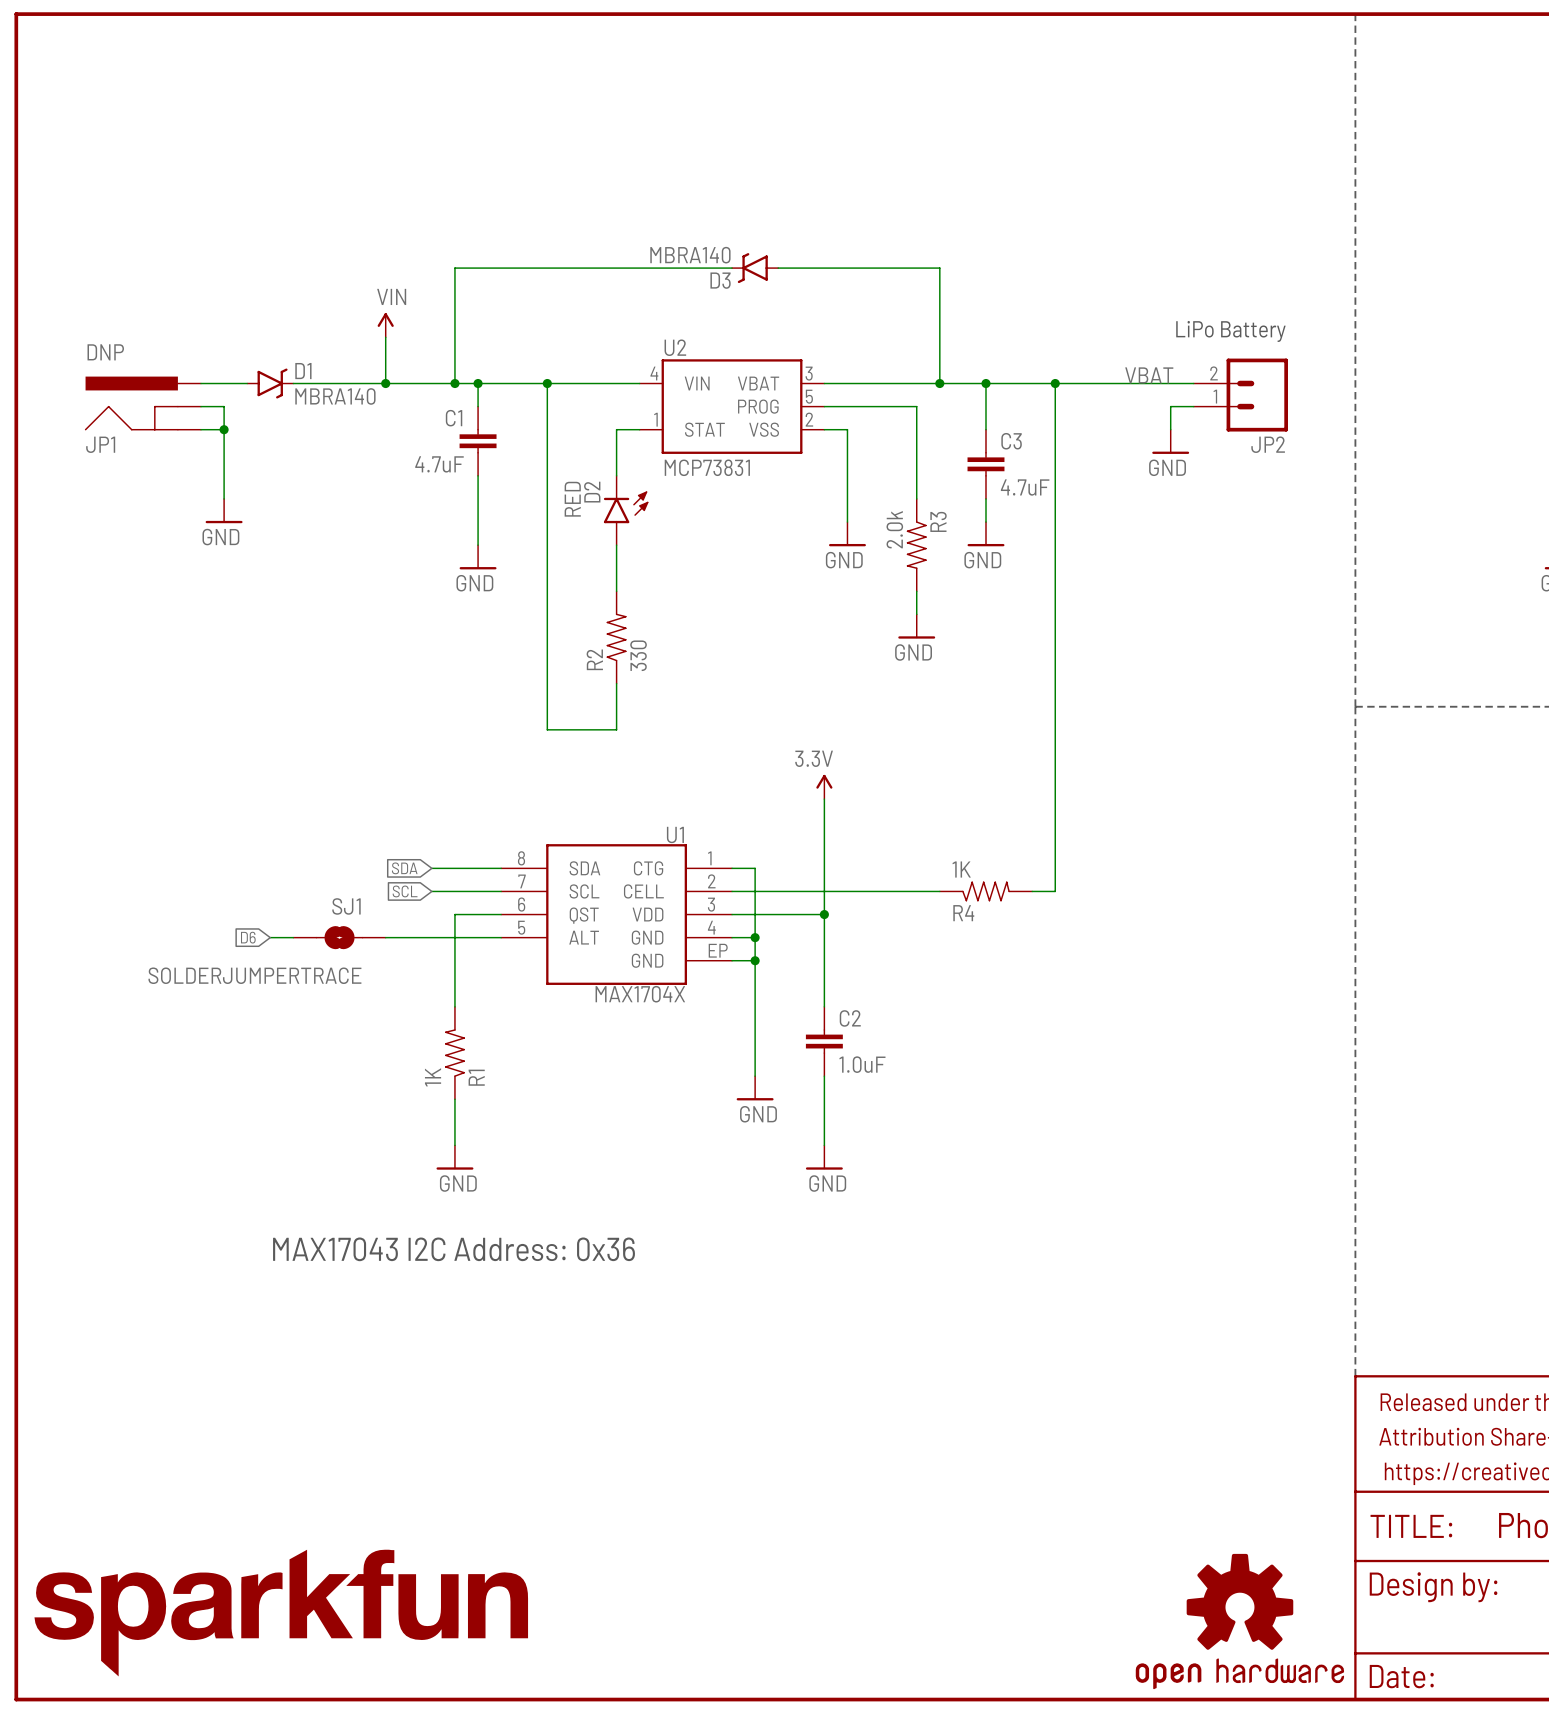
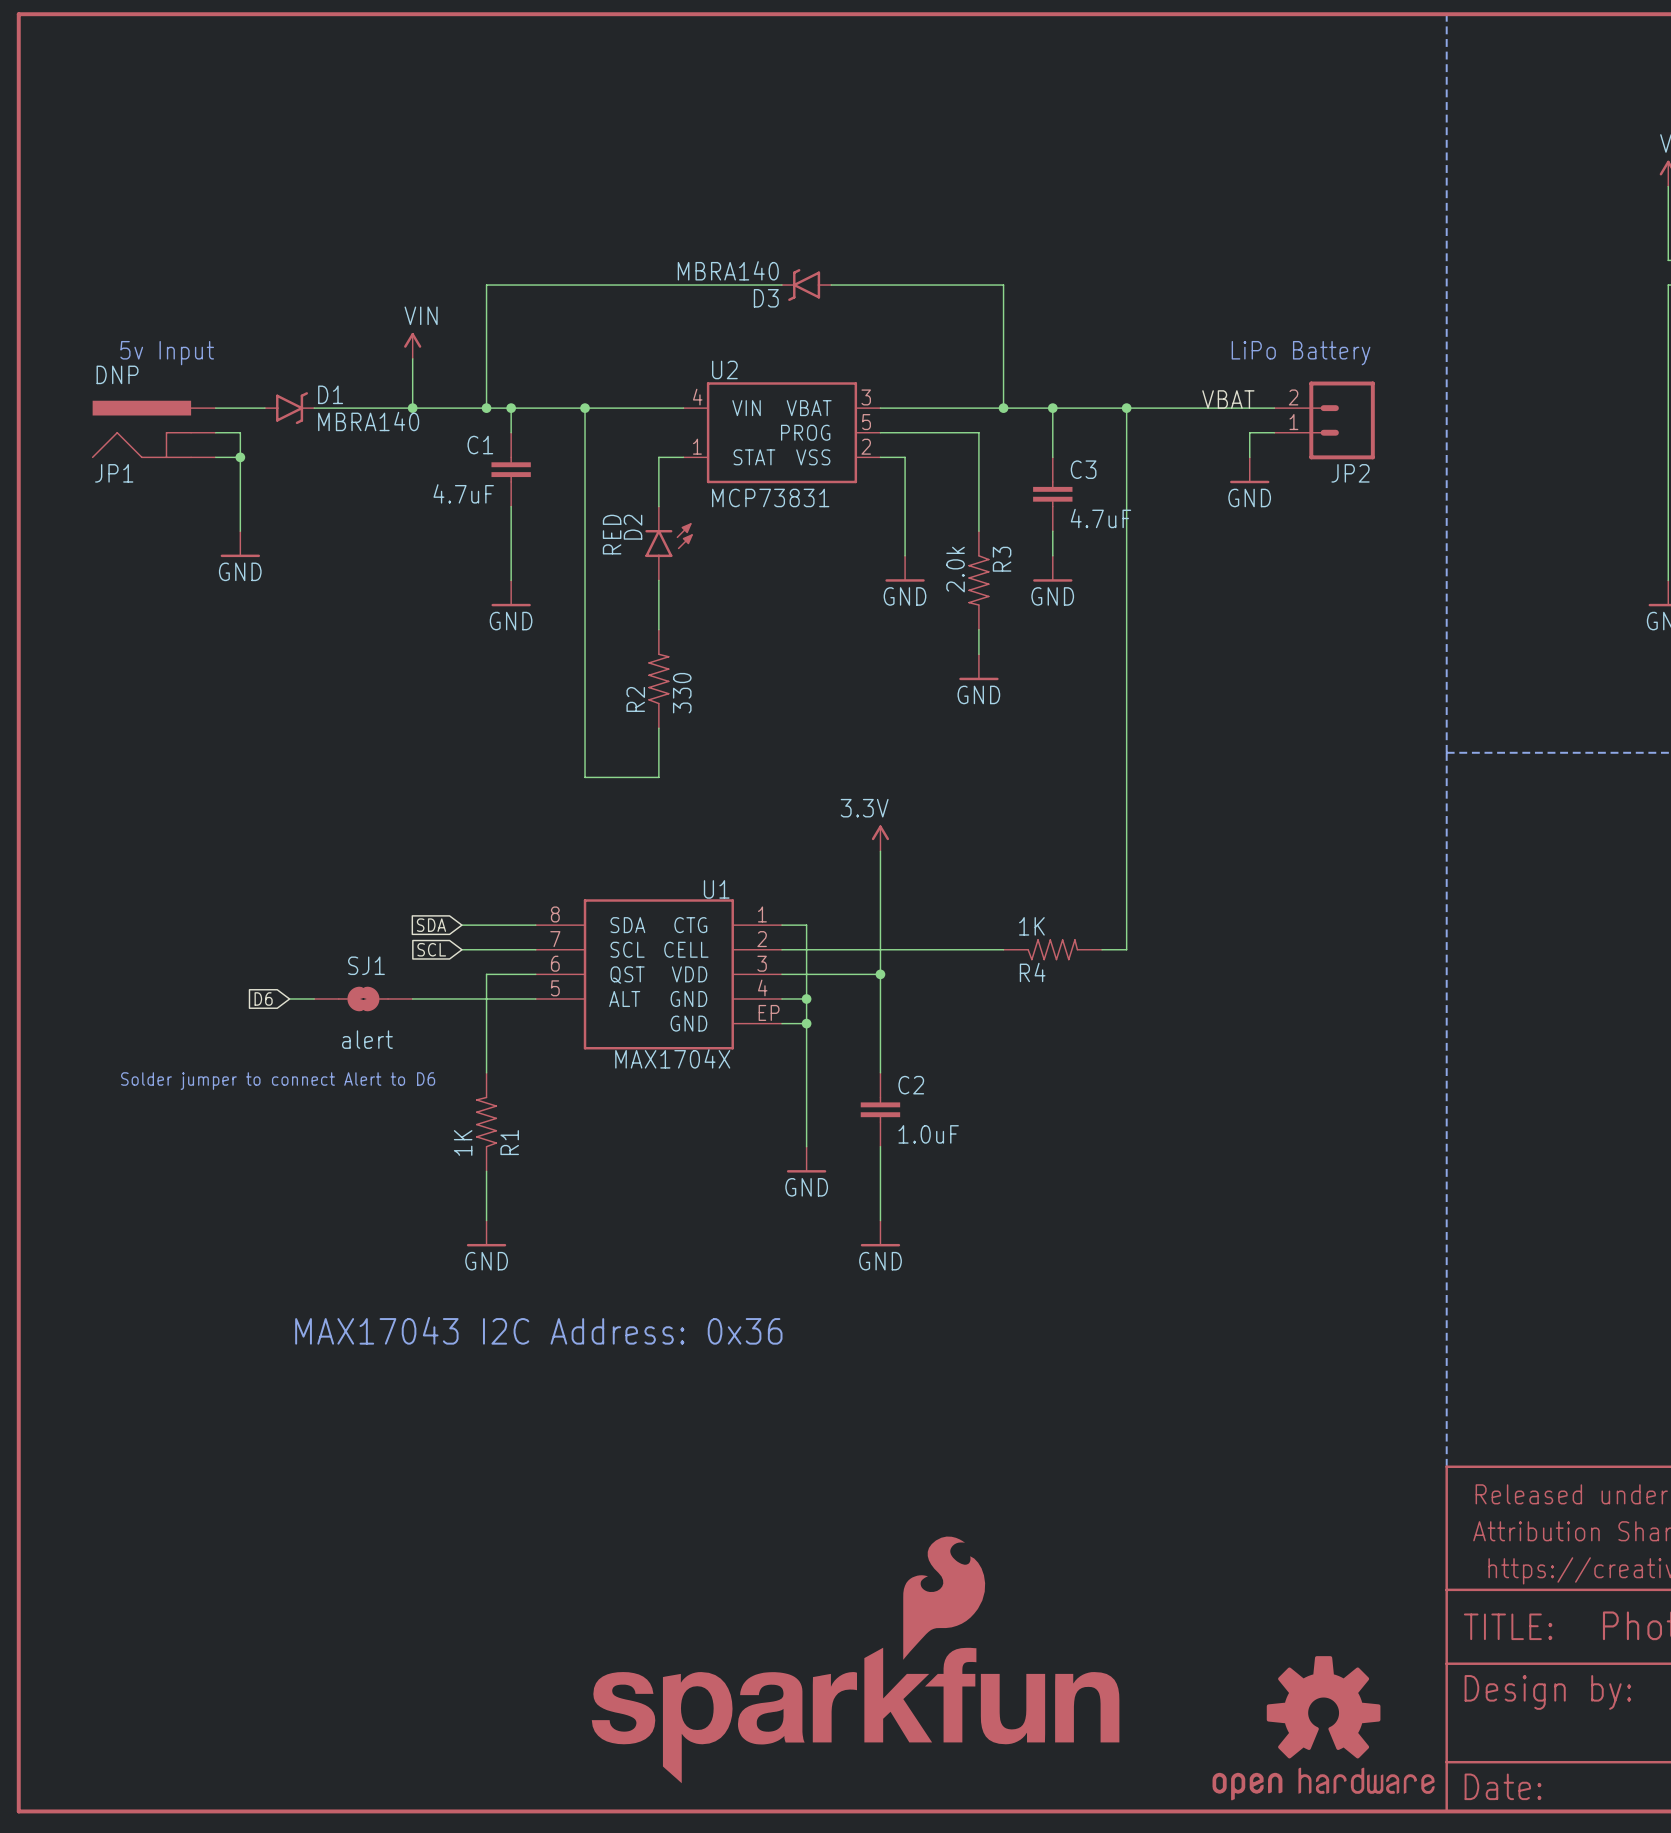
text: none -> 5v Input (167, 353)
SJ1 value: SOLDERJUMPERTRACE (254, 975) -> alert (367, 1039)
text: none -> Solder jumper to connect Alert to D6 (278, 1081)
part: none -> (855, 1659)
part: (281, 1613) -> none

